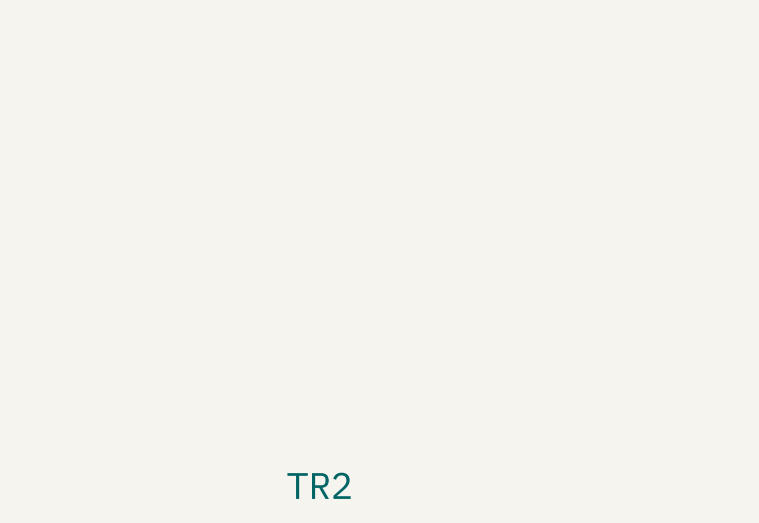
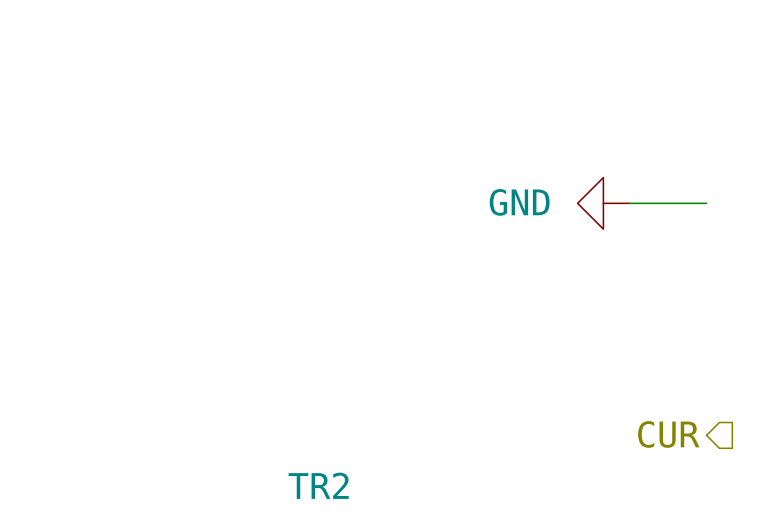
power symbol: none -> GND (603, 203)
wire: none -> (629, 203) (706, 203)
hierarchical label: none -> CUR (668, 434)

